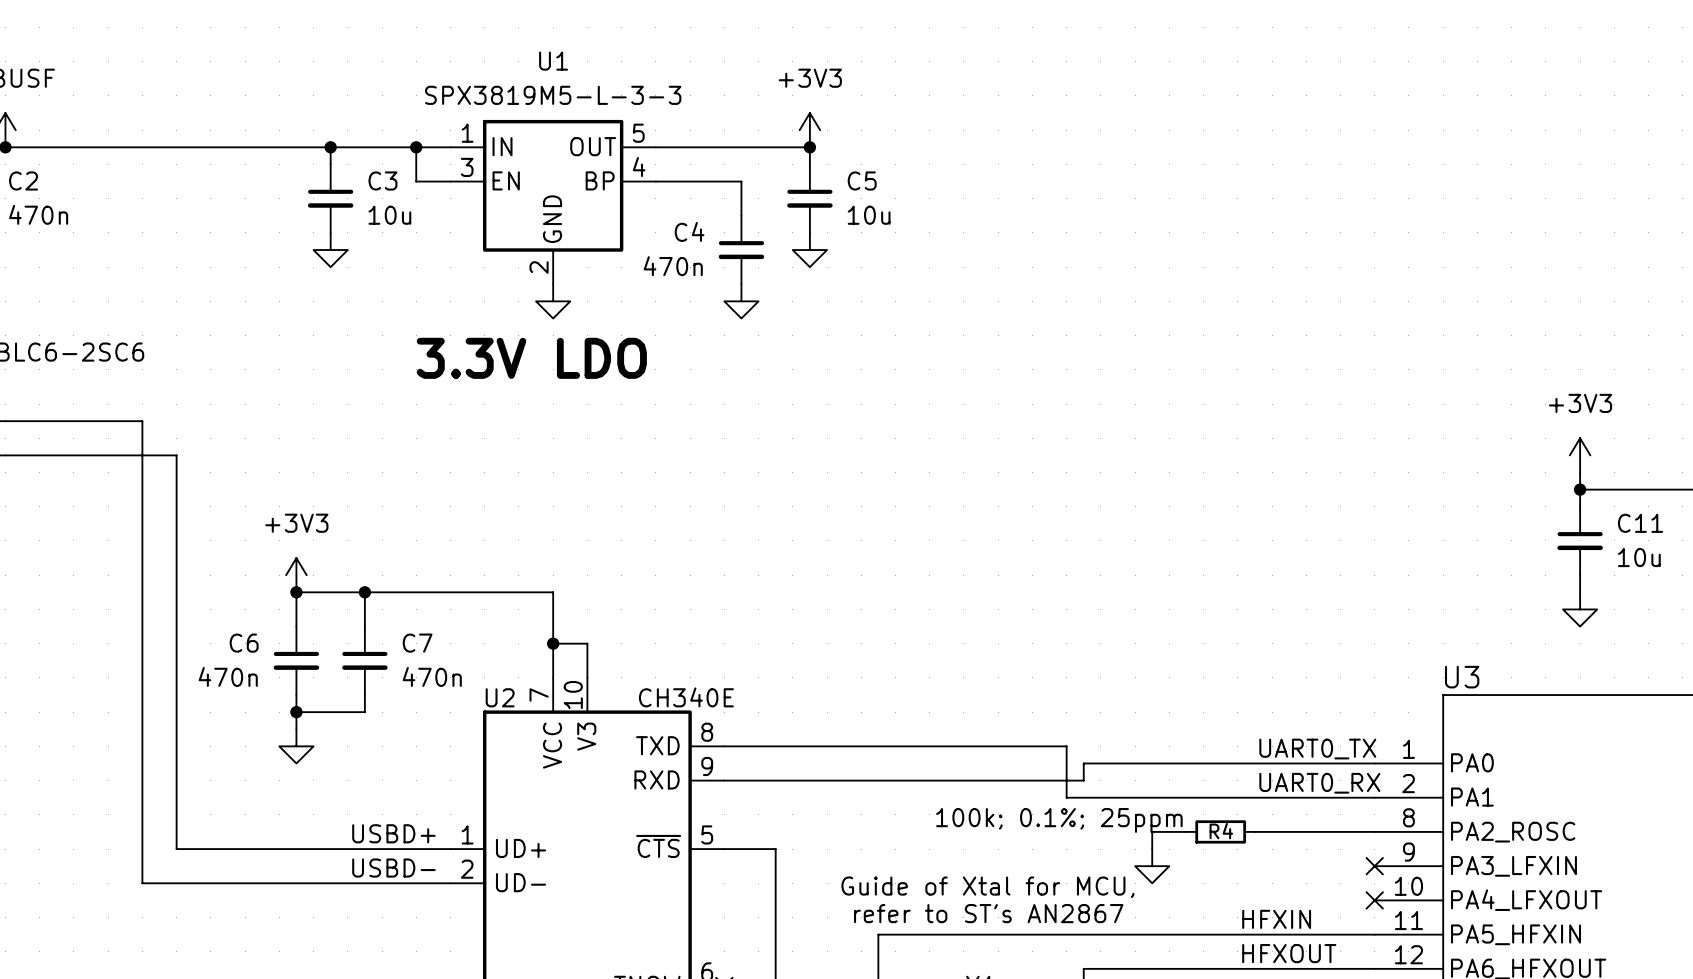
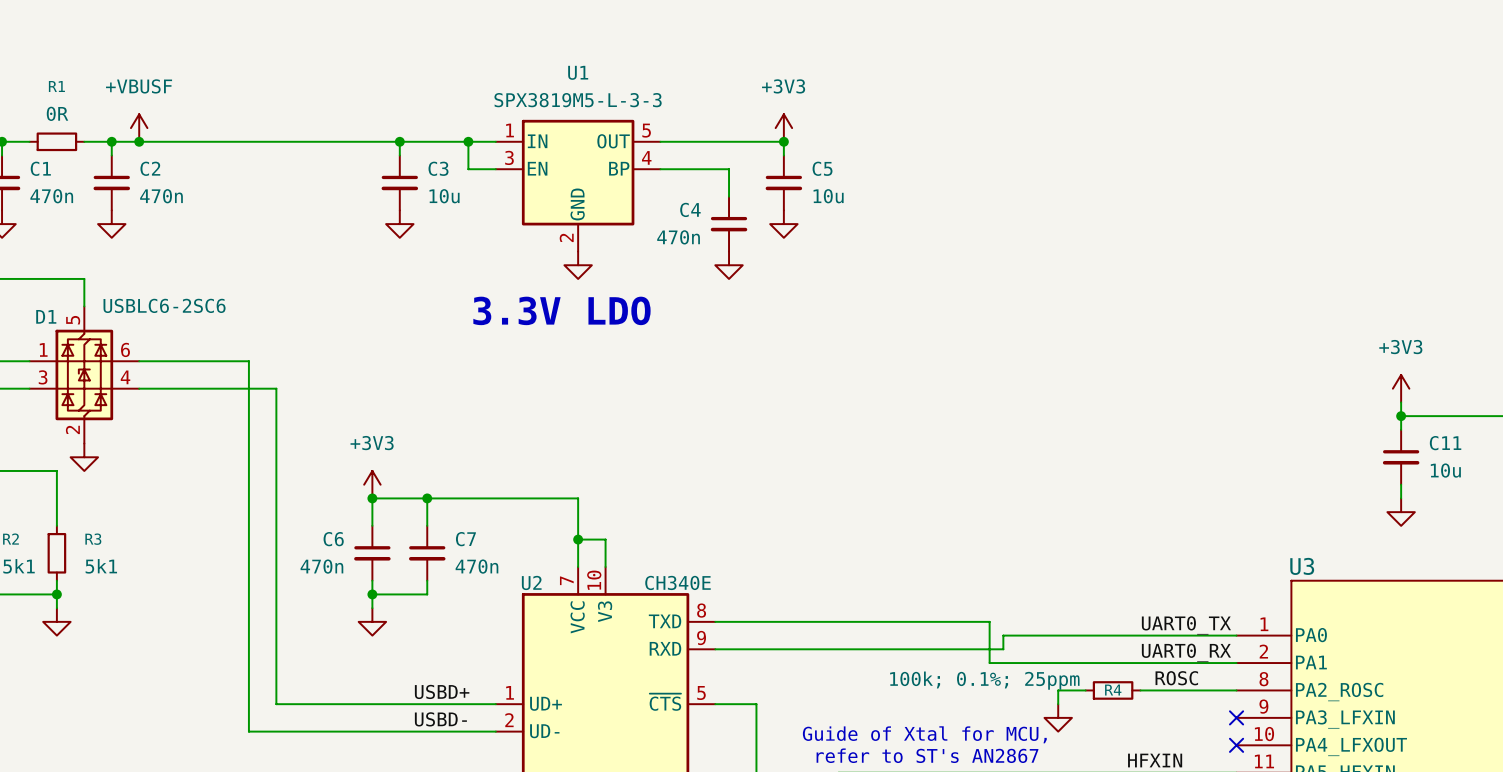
label: none -> ROSC (1176, 678)

